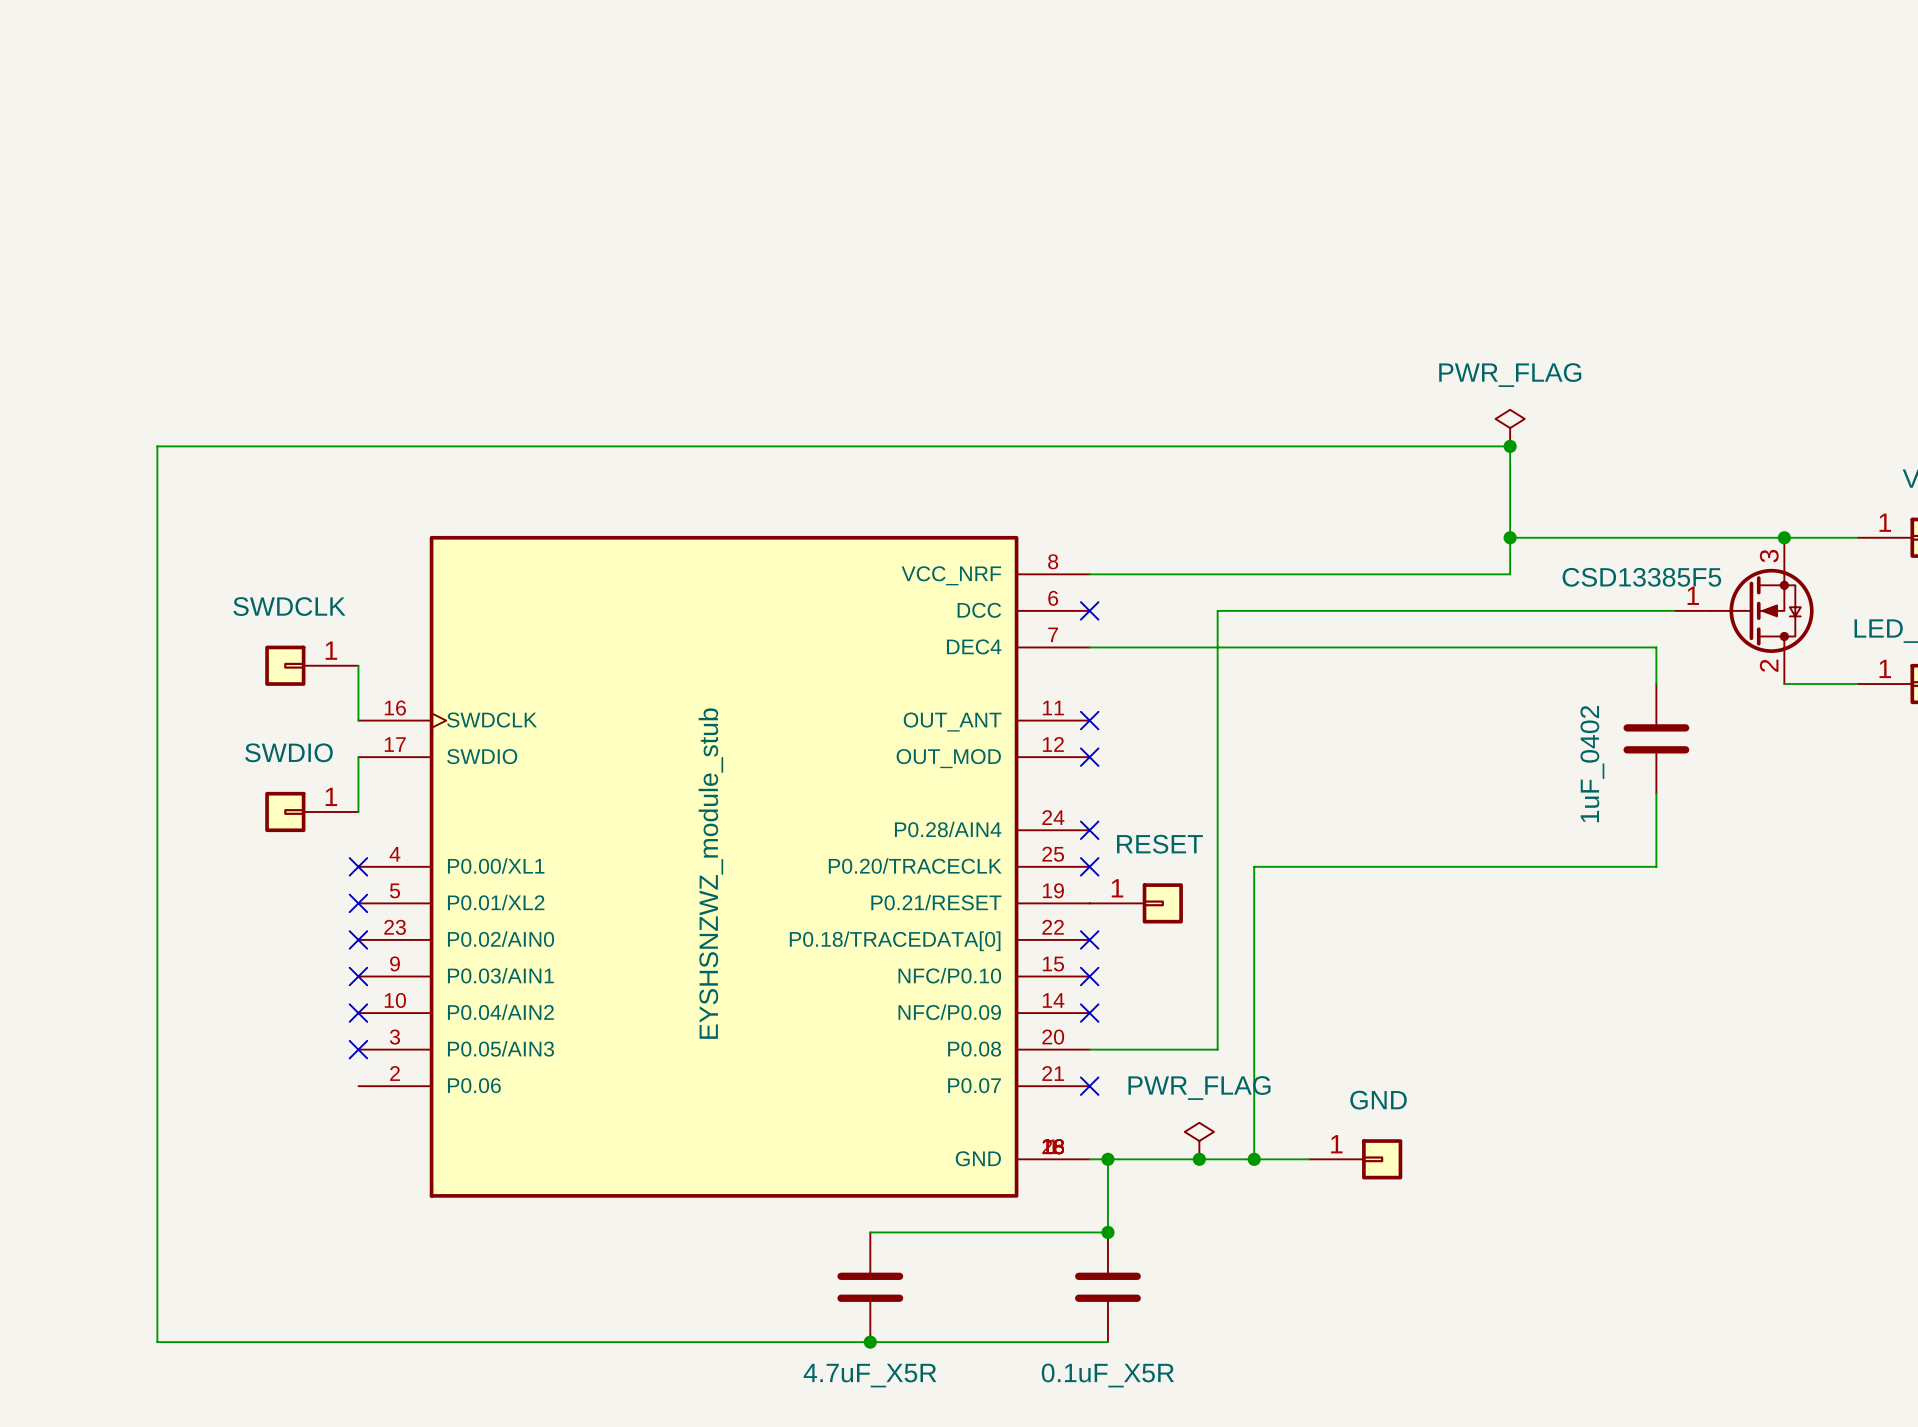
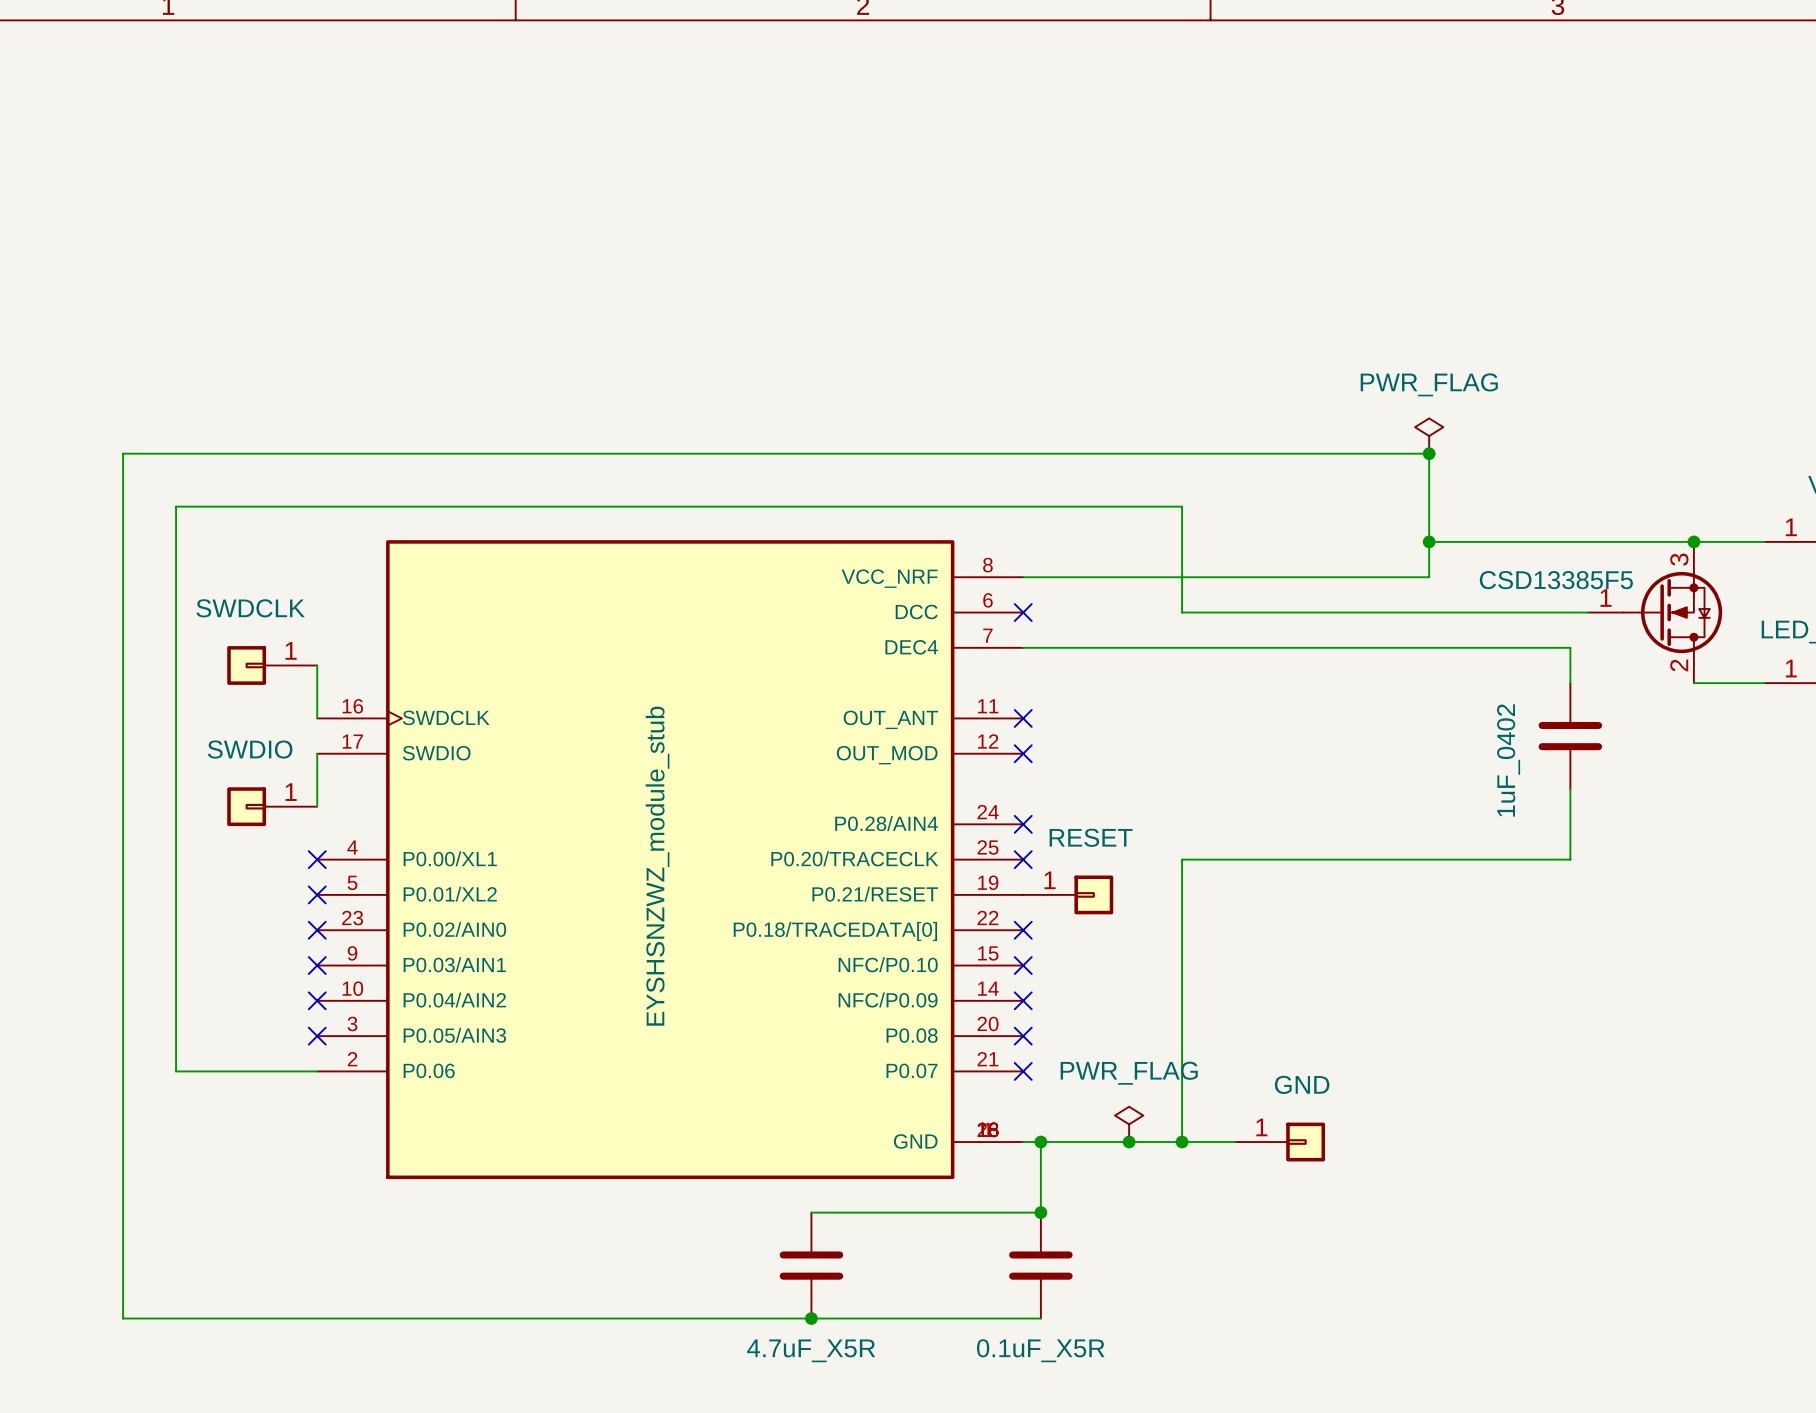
wire: (1254, 610) (1217, 610) (1217, 1049) (1089, 1049) -> (1182, 612) (1182, 506) (176, 506) (176, 1071) (317, 1071)
no-connect mark: none -> (1023, 1036)

